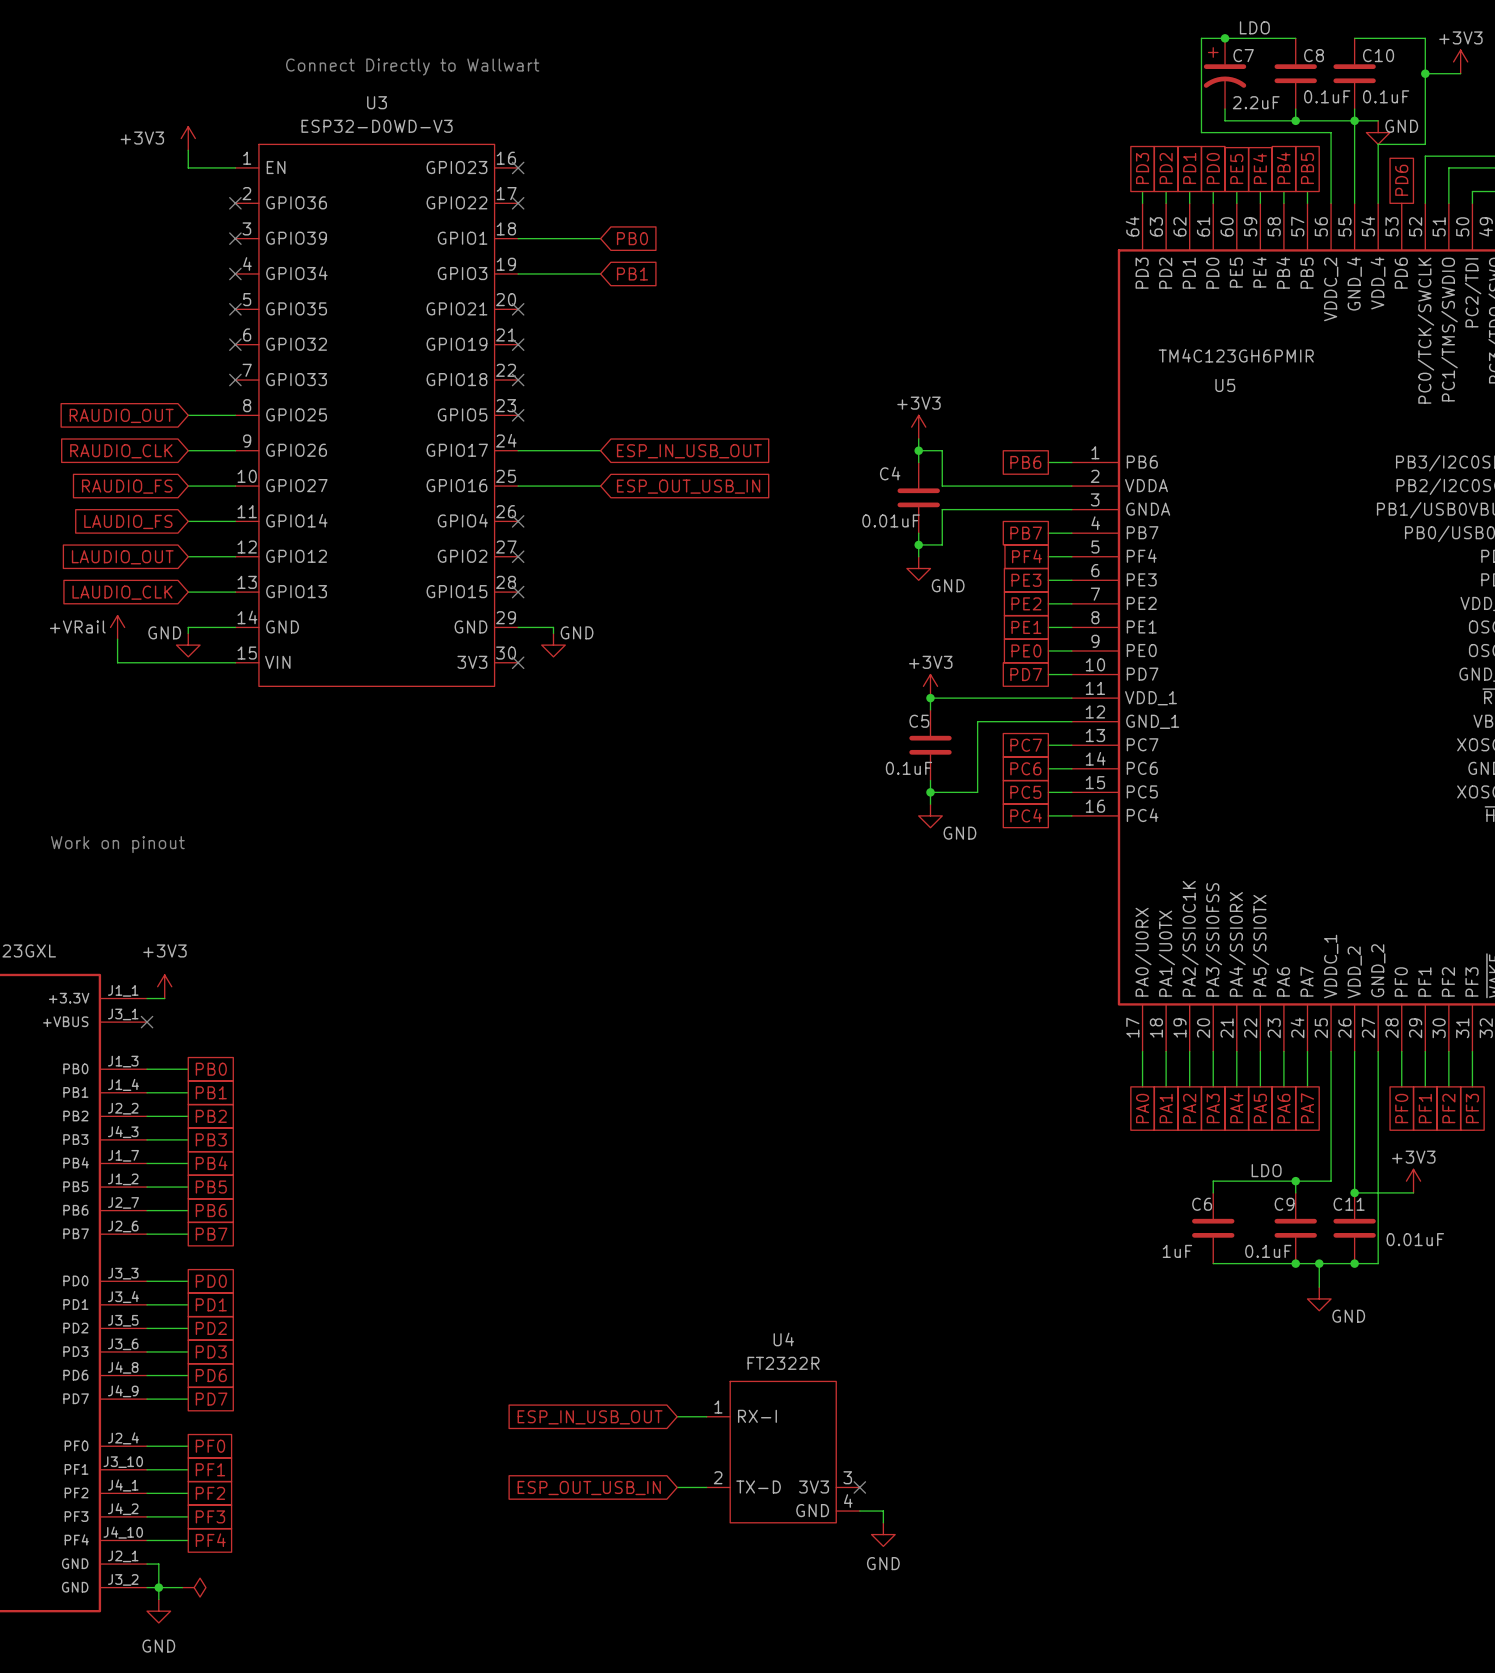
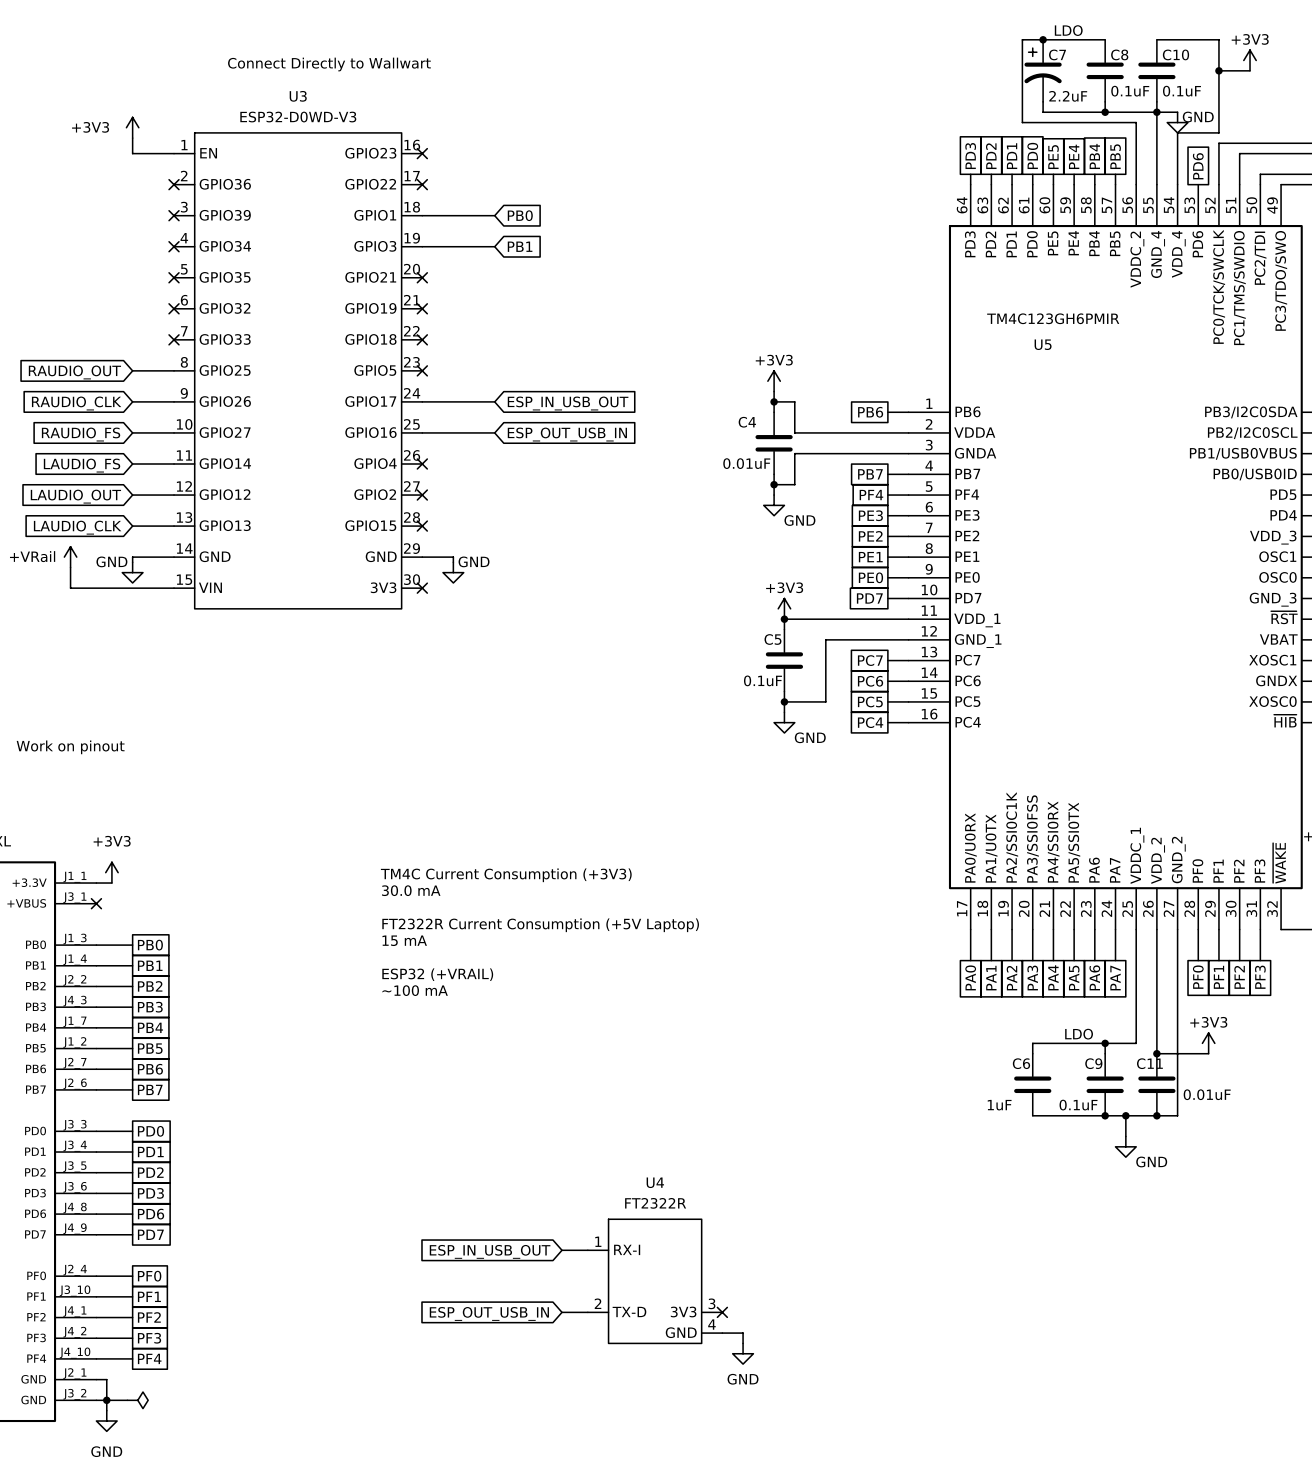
text: none -> TM4C Current Consumption (+3V3) (506, 875)
text: none -> 30.0 mA (411, 890)
text: none -> FT2322R Current Consumption (+5V Laptop) (540, 925)
text: none -> 15 mA (404, 940)
text: none -> ESP32 (+VRAIL) (437, 974)
text: none -> ~100 mA (415, 990)

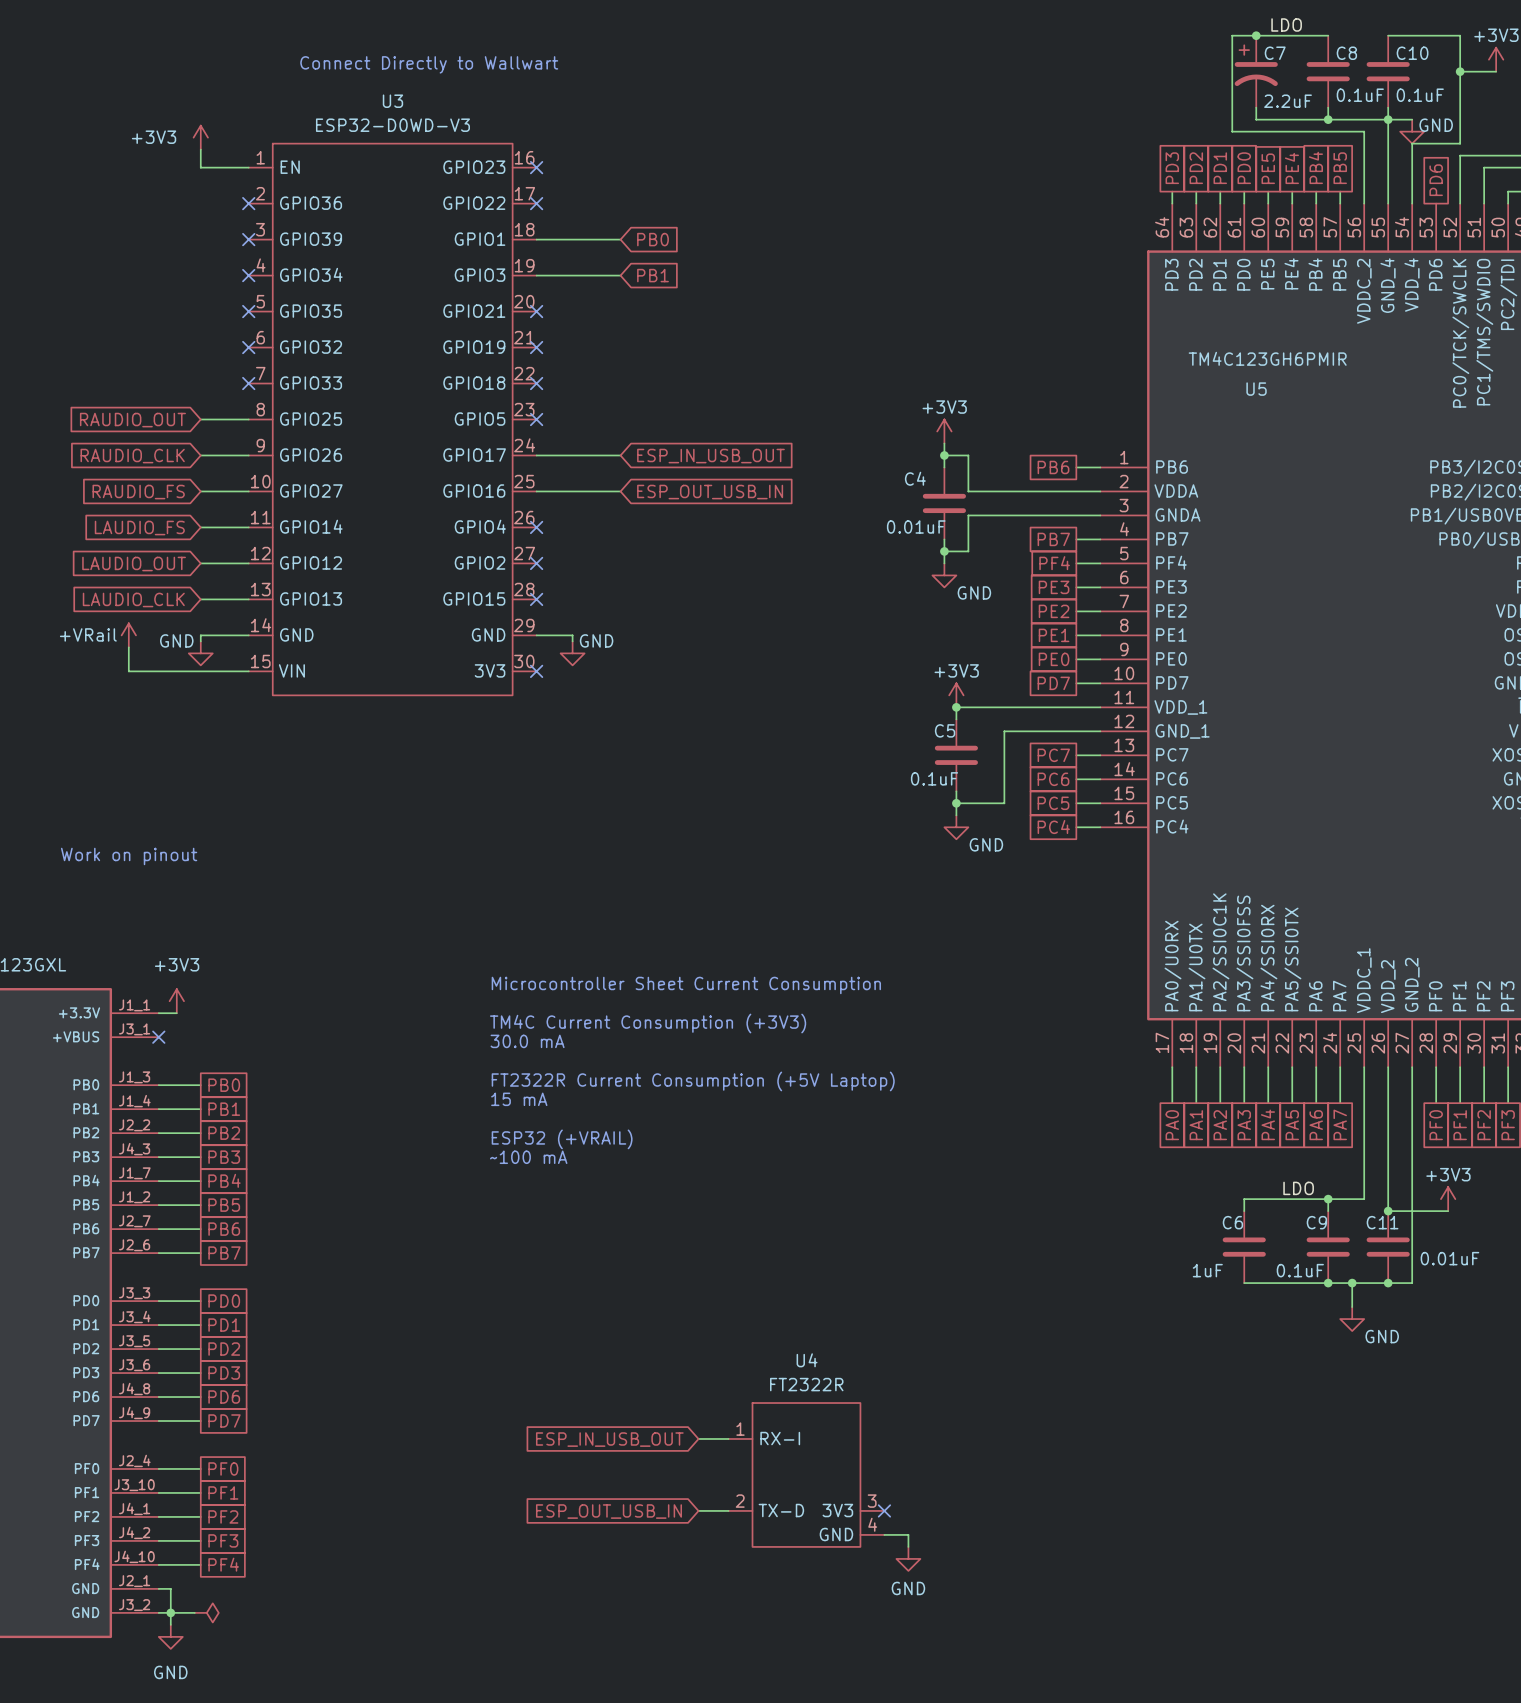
text: none -> Microcontroller Sheet Current Consumption (686, 985)
text: TM4C Current Consumption (+3V3) (506, 875) -> none
text: 30.0 mA (411, 890) -> TM4C Current Consumption (+3V3) (648, 1023)
text: none -> 30.0 mA (527, 1041)
text: FT2322R Current Consumption (+5V Laptop) (540, 925) -> none
text: 15 mA (404, 940) -> FT2322R Current Consumption (+5V Laptop) (693, 1081)
text: none -> 15 mA (519, 1099)
text: ESP32 (+VRAIL) (437, 974) -> none
text: ~100 mA (415, 990) -> ESP32 (+VRAIL) (562, 1139)
text: none -> ~100 mA (528, 1157)

